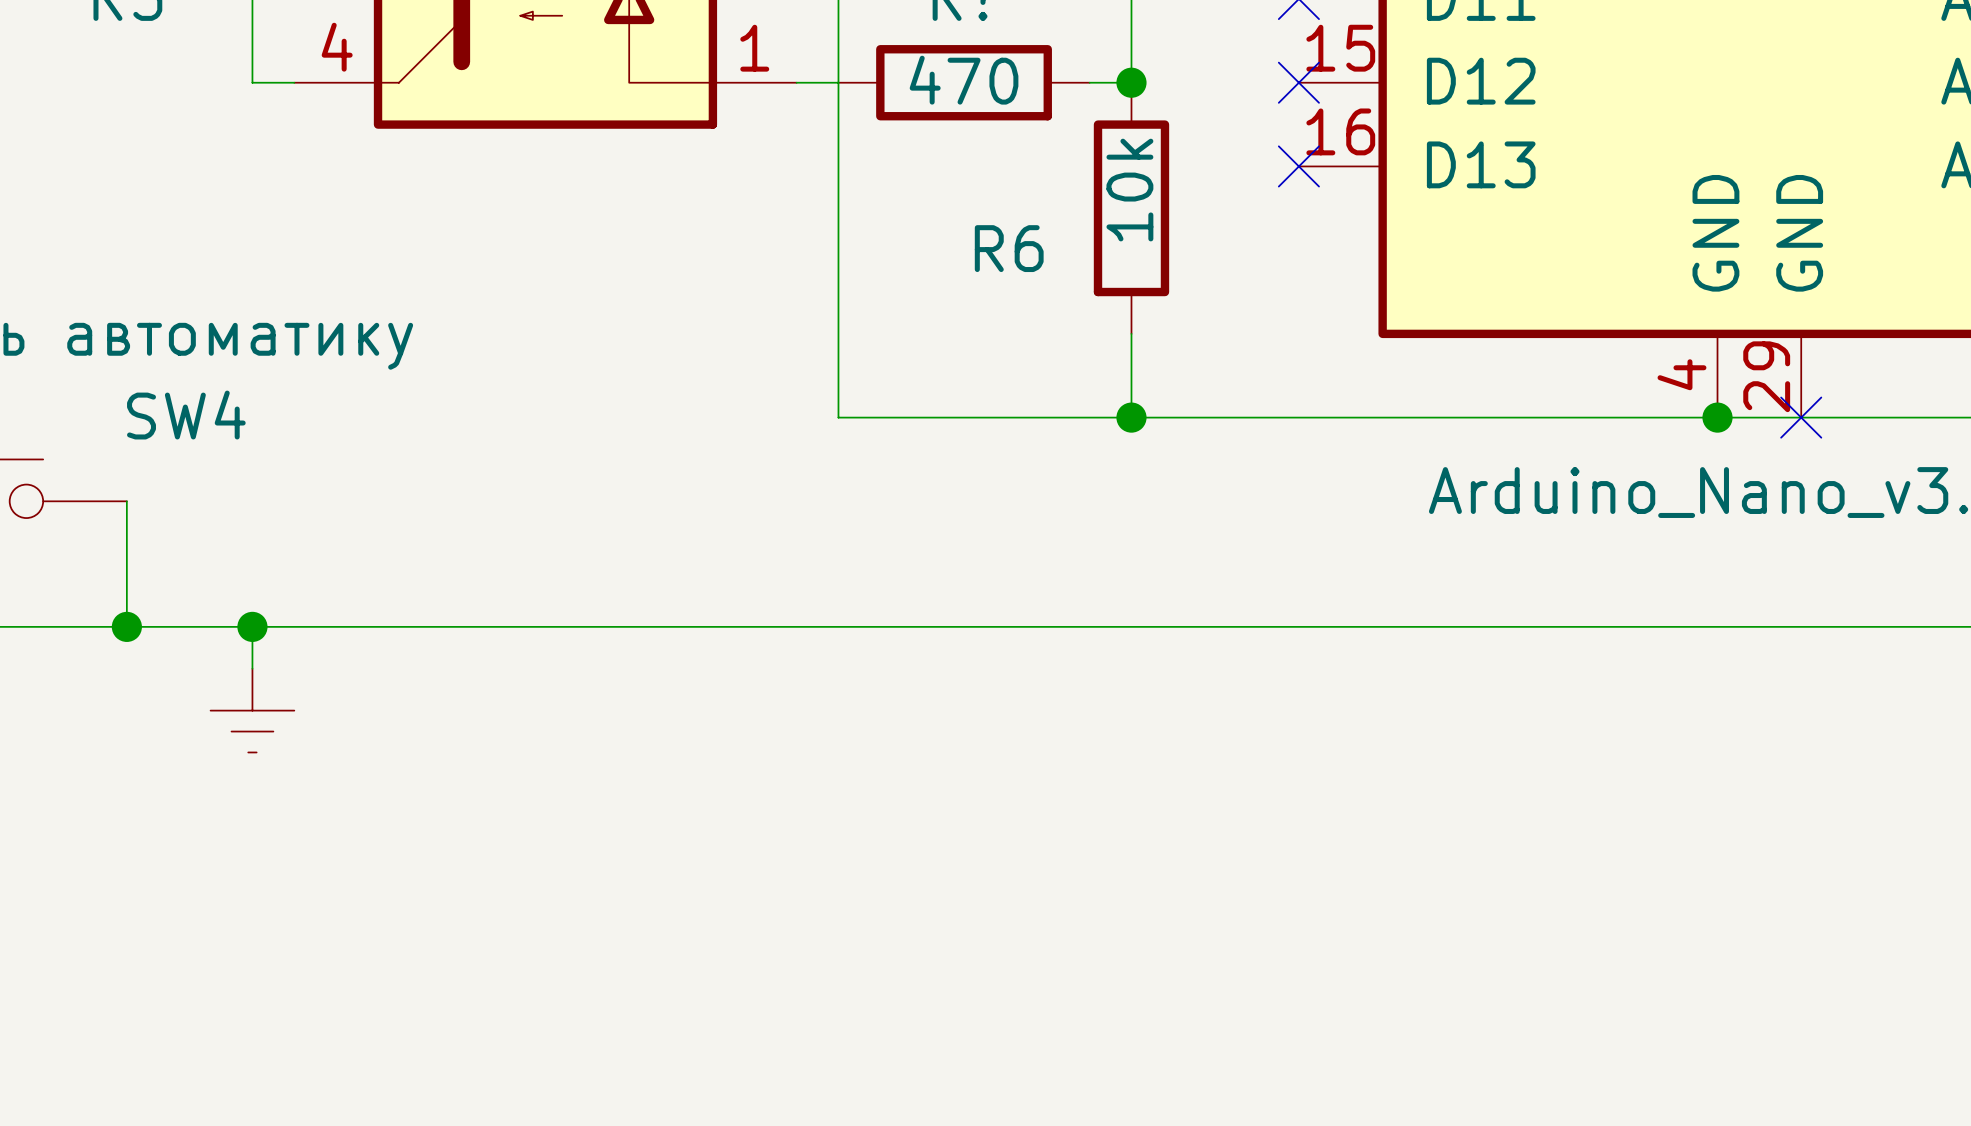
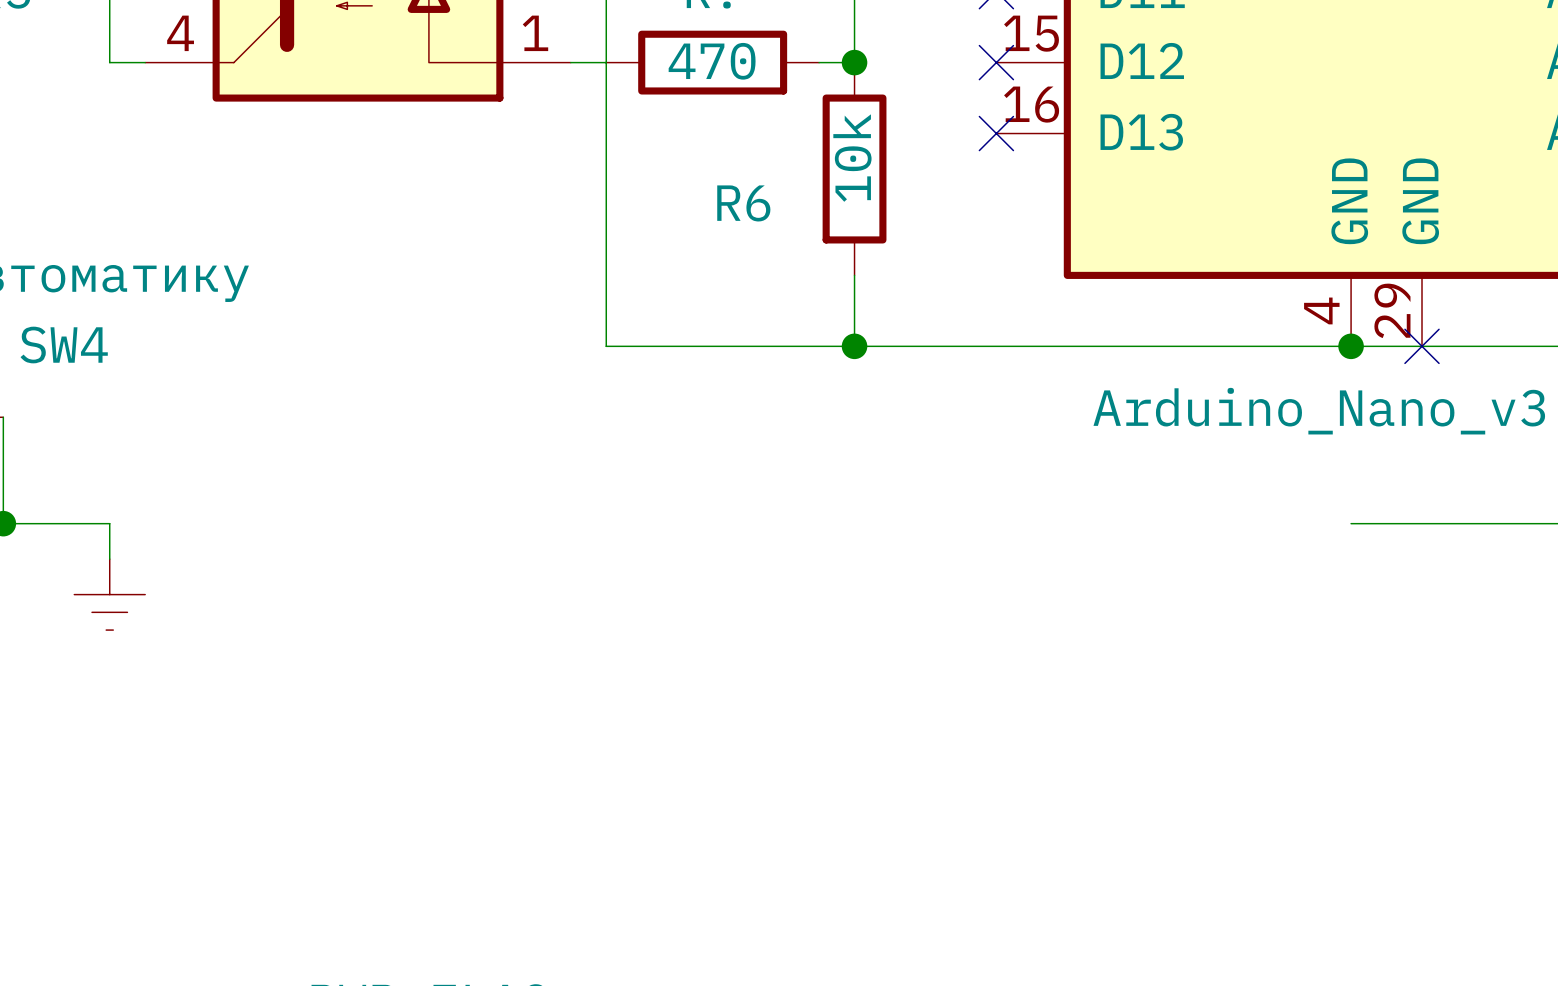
wire: (252, 626) (1717, 626) -> none
junction: (252, 626) -> none

